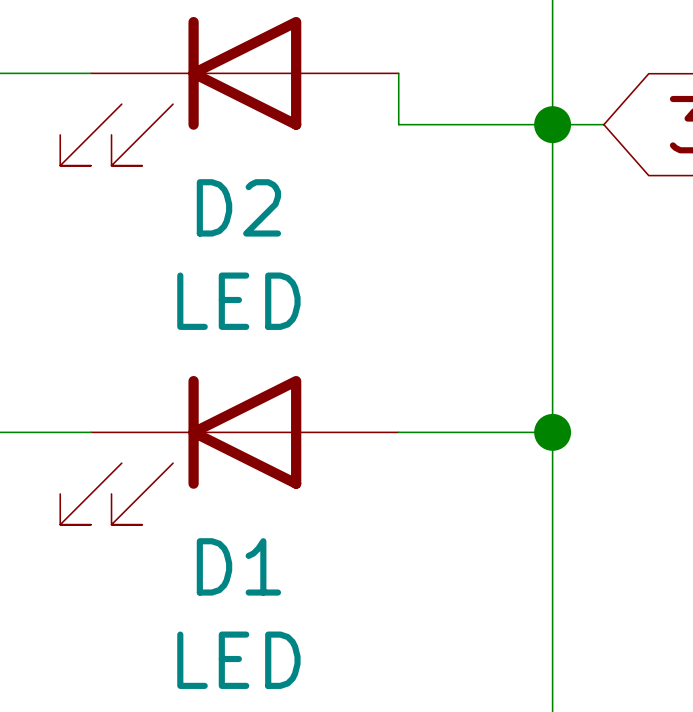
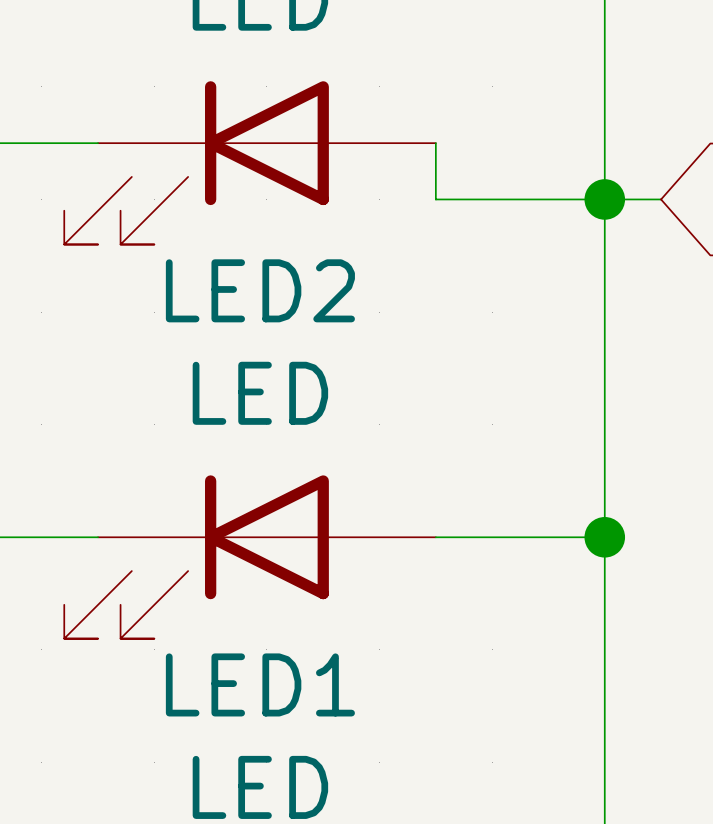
D2 name: D2 (238, 207) -> LED2 (260, 290)
D1 name: D1 (238, 566) -> LED1 (260, 684)

